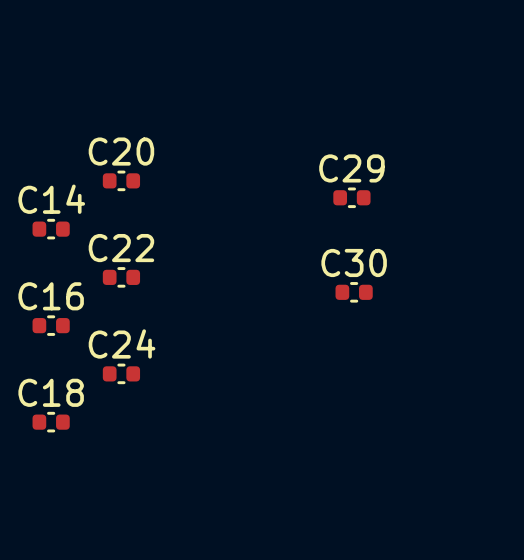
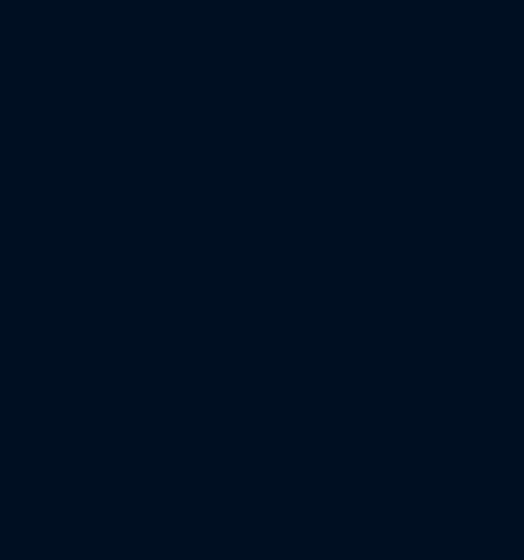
C20: (121, 180) -> none
C29: (351, 197) -> none
C14: (51, 229) -> none
C22: (121, 277) -> none
C30: (354, 292) -> none
C16: (51, 325) -> none
C24: (121, 373) -> none
C18: (51, 422) -> none

